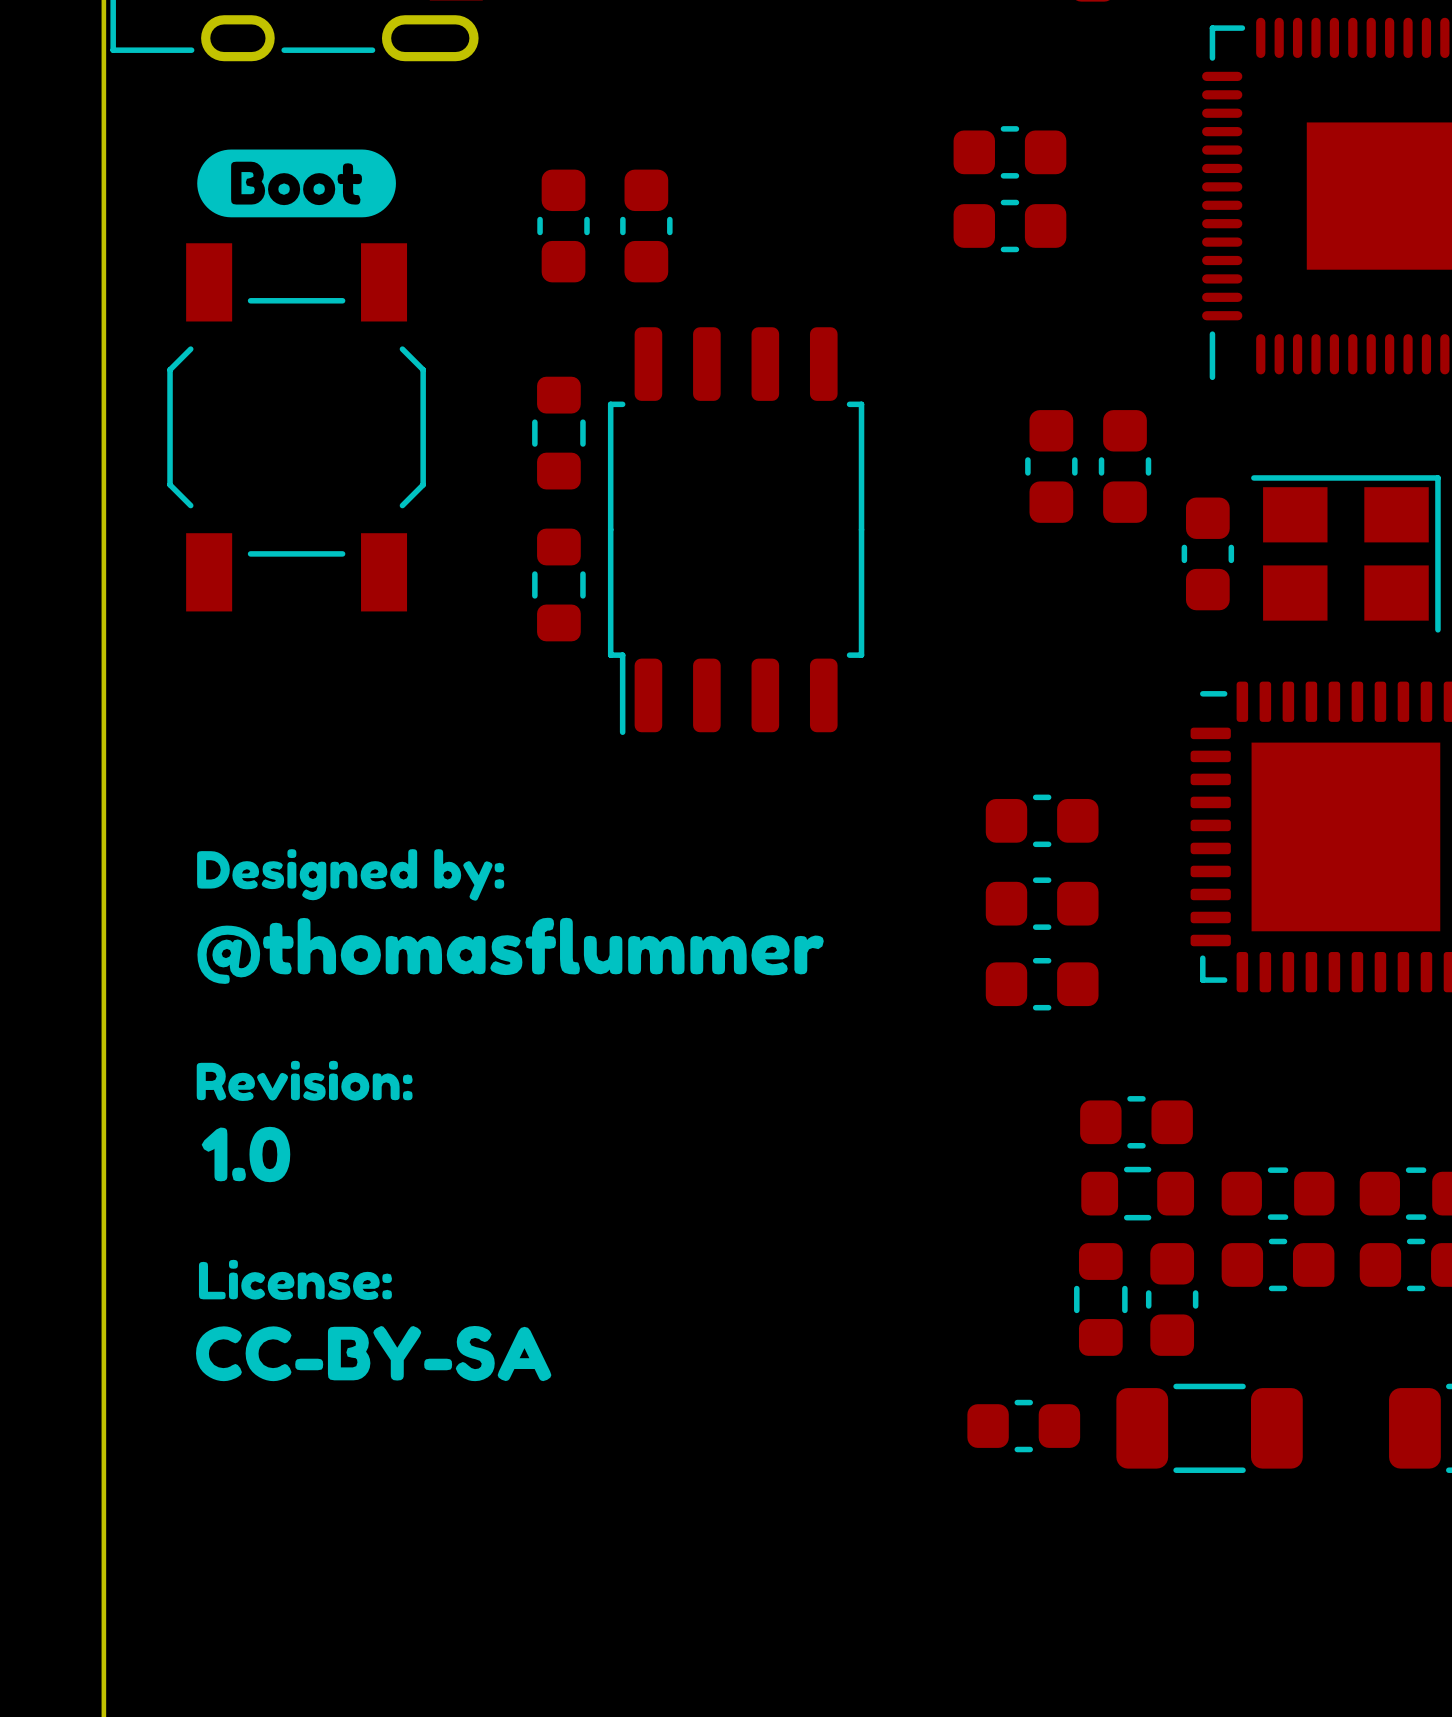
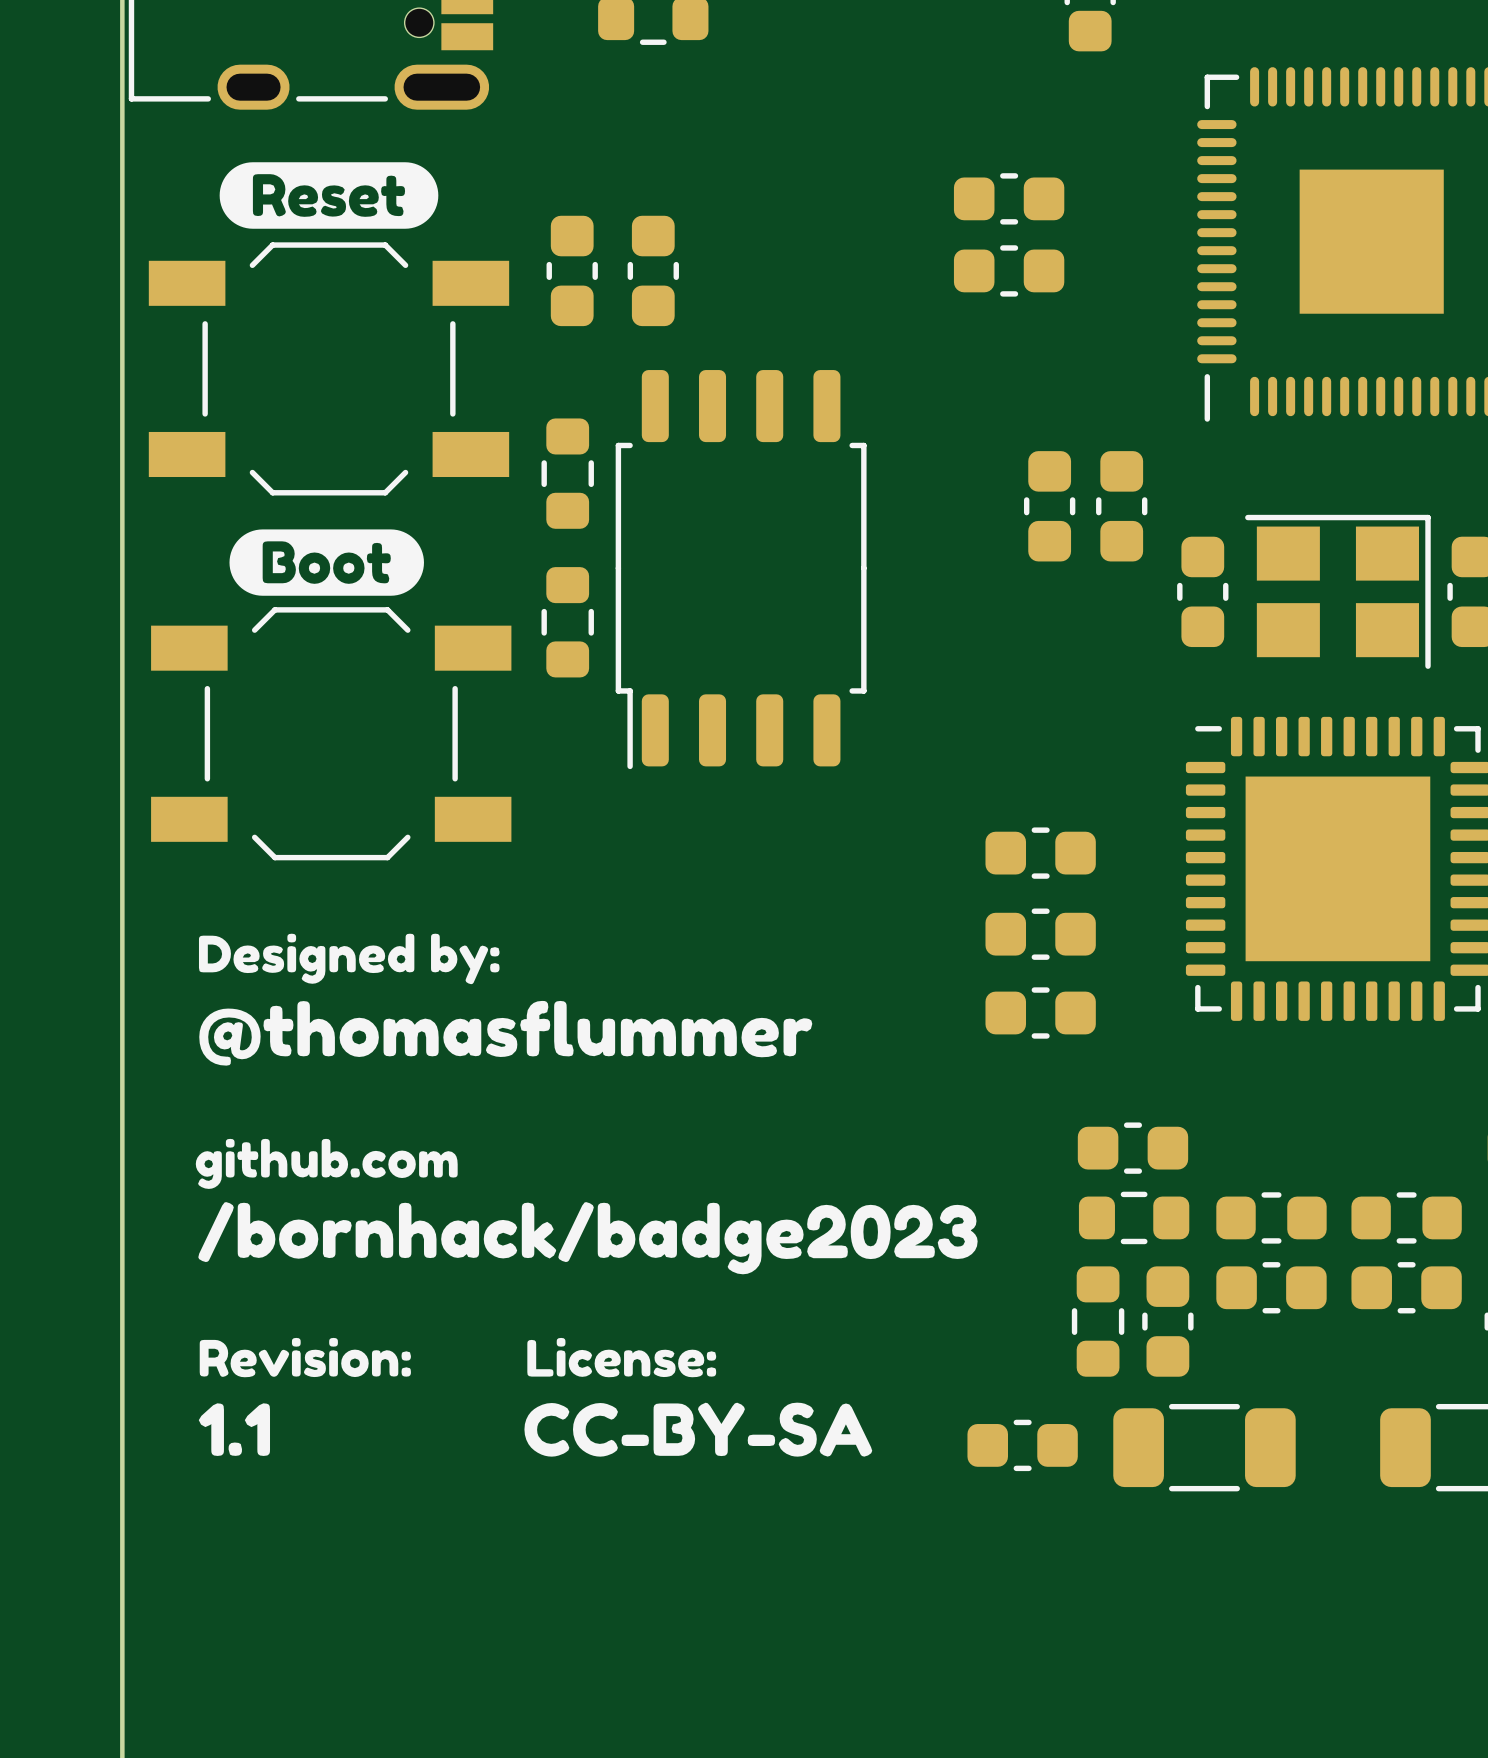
drawing: none -> [219, 162, 439, 229]
drawing position: (296, 183) -> (326, 562)
part rotation: 0° (296, 427) -> 90° clockwise (328, 368)
part: none -> (331, 733)
drawing position: (350, 874) -> (349, 958)
drawing position: (510, 950) -> (505, 1033)
drawing position: (304, 1080) -> (305, 1357)
drawing: none -> [195, 1138, 978, 1275]
drawing: [201, 1126, 291, 1183] -> none
drawing position: (295, 1279) -> (621, 1357)
drawing position: (373, 1353) -> (698, 1429)
drawing: none -> [198, 1403, 271, 1456]

